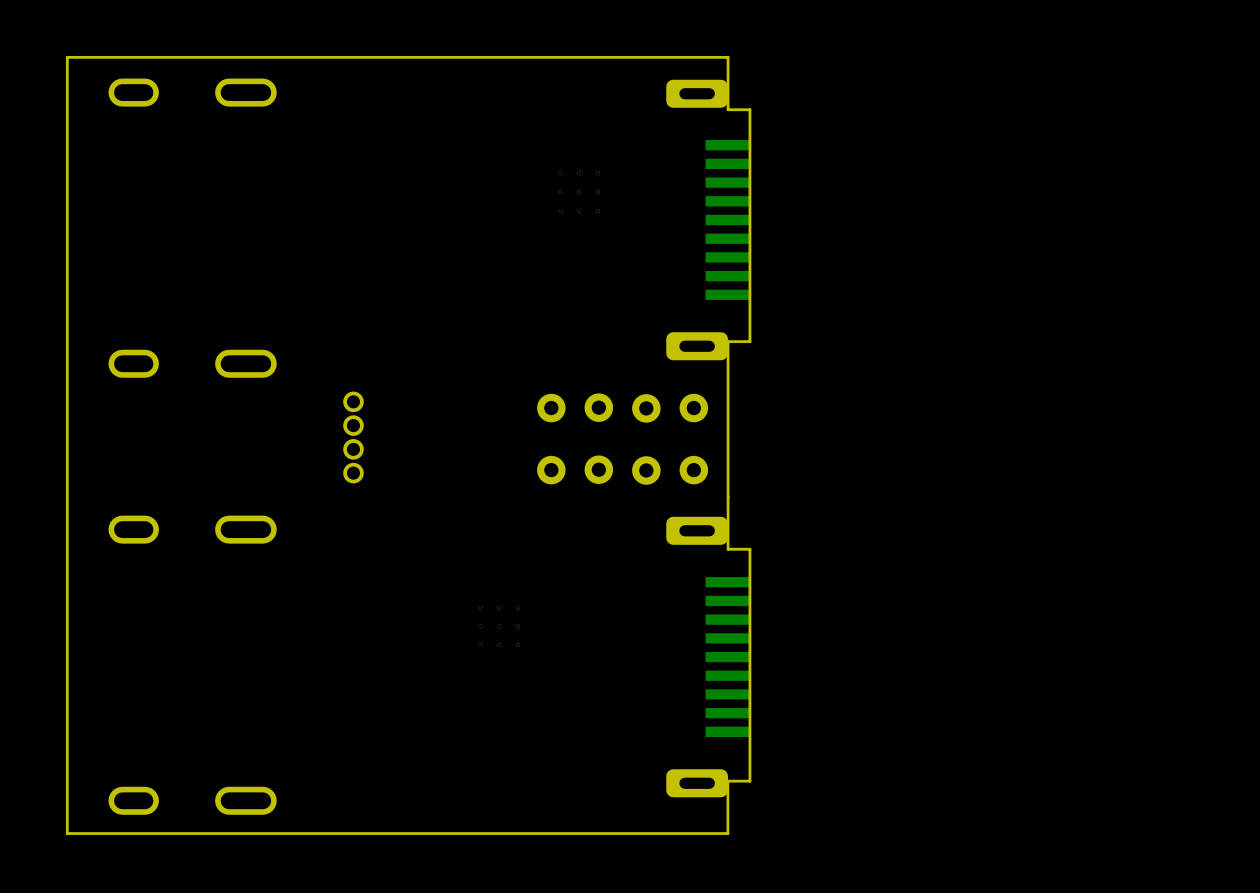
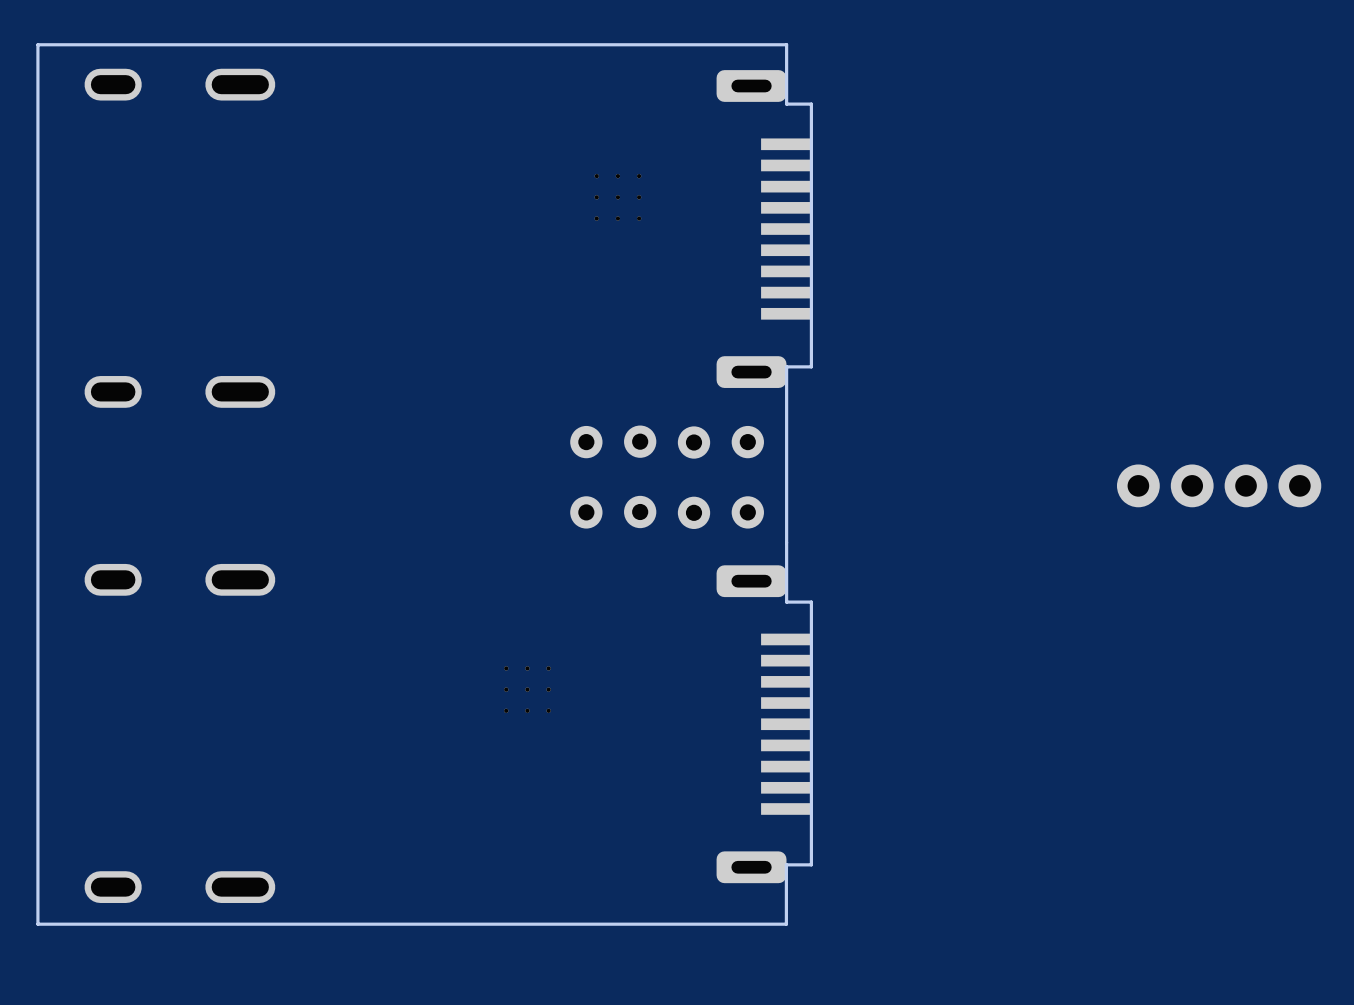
part: (353, 437) -> none
part: none -> (1219, 485)

